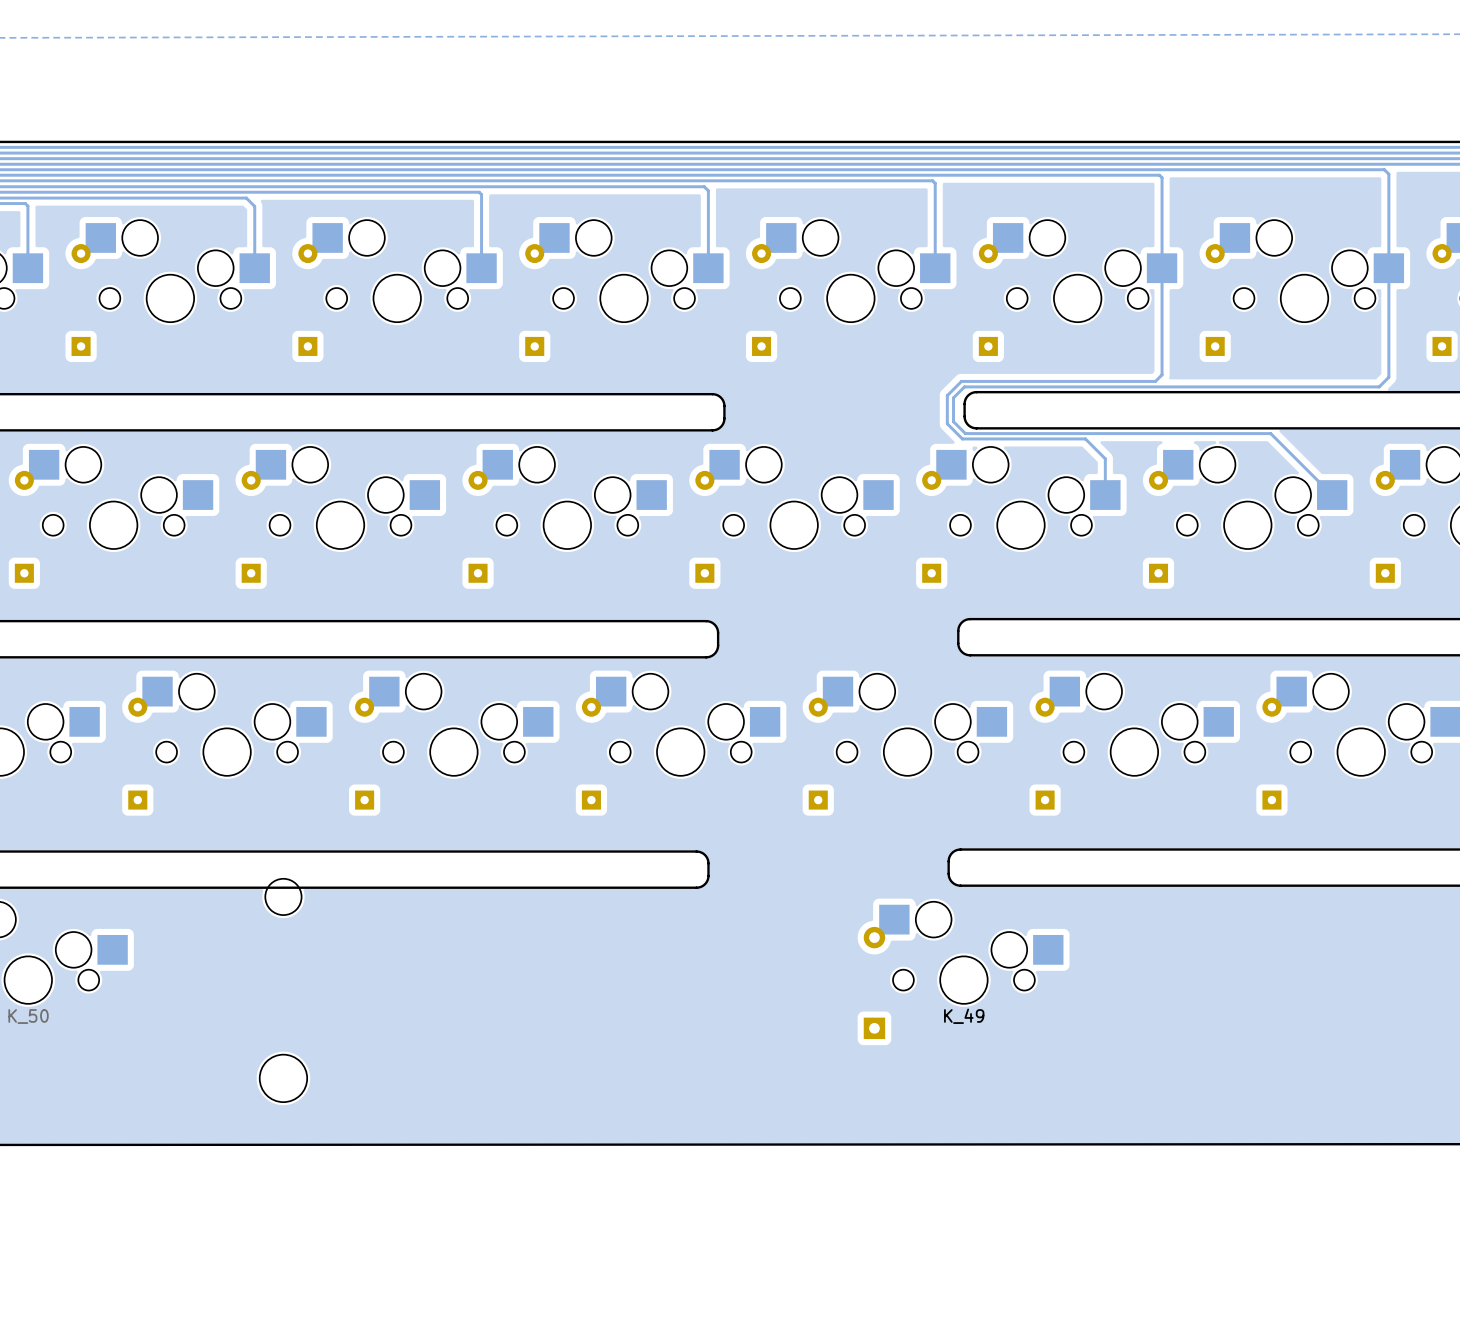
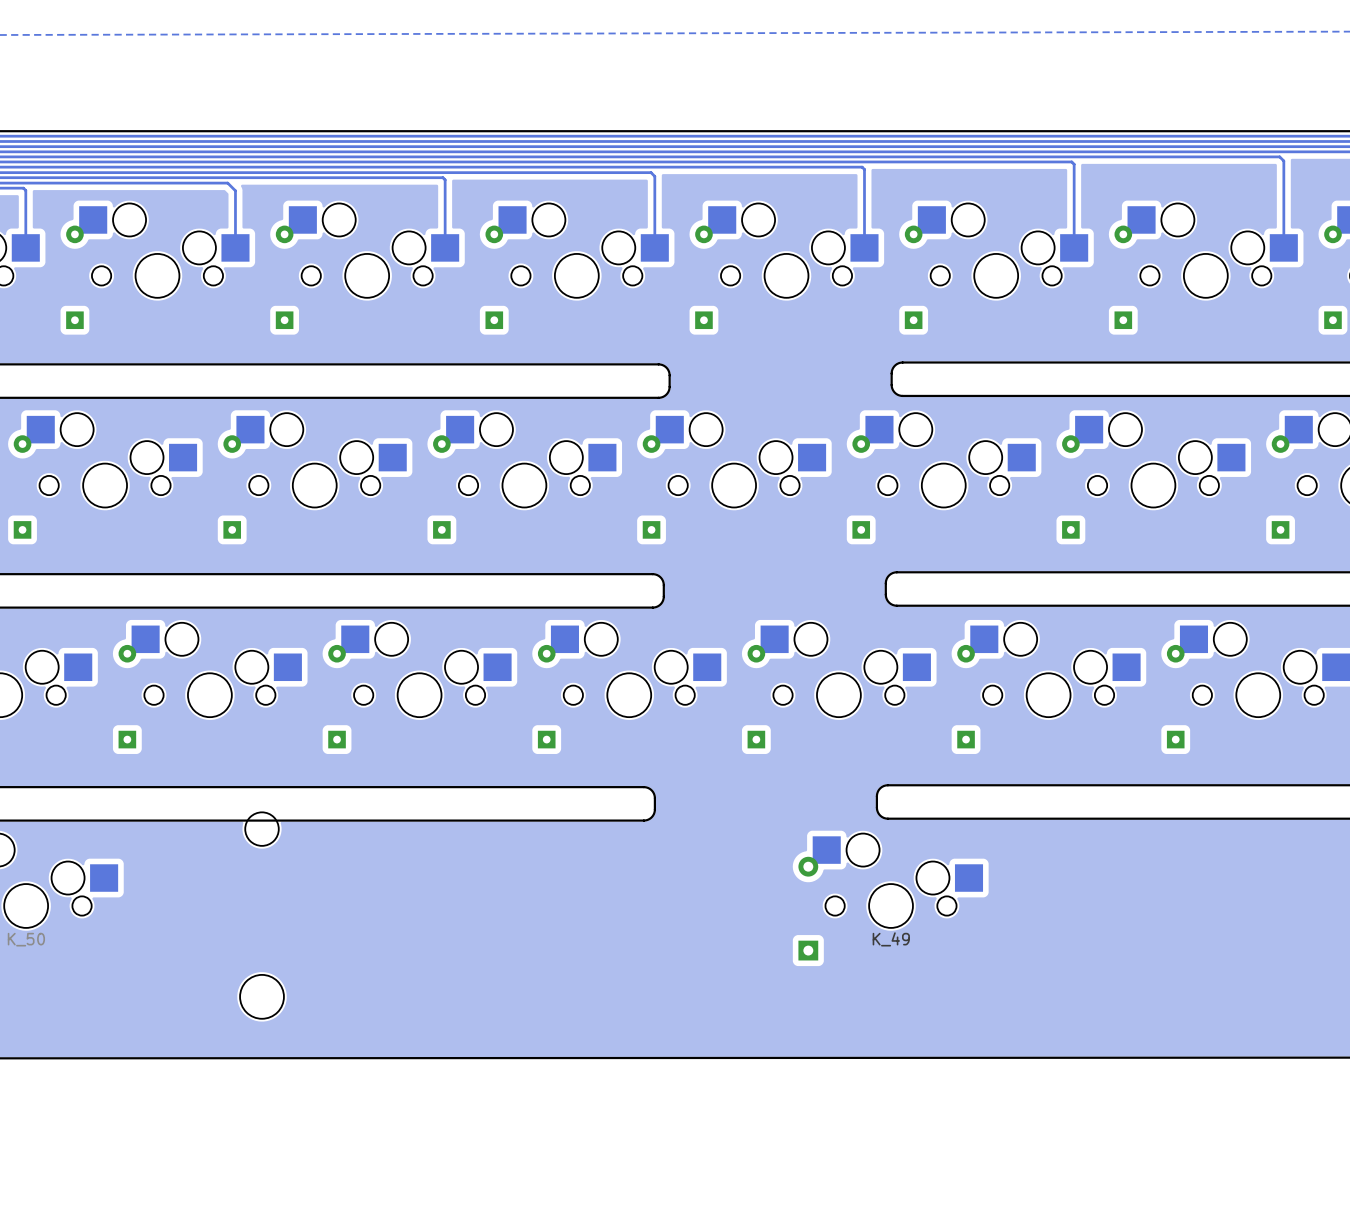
track: (1162, 268) (1162, 374) (1155, 381) (961, 381) (947, 395) (947, 423) (962, 438) (1085, 438) (1105, 458) (1105, 495) -> none
track: (1388, 268) (1388, 377) (1379, 386) (964, 386) (953, 397) (953, 421) (965, 433) (1270, 433) (1332, 495) -> none

